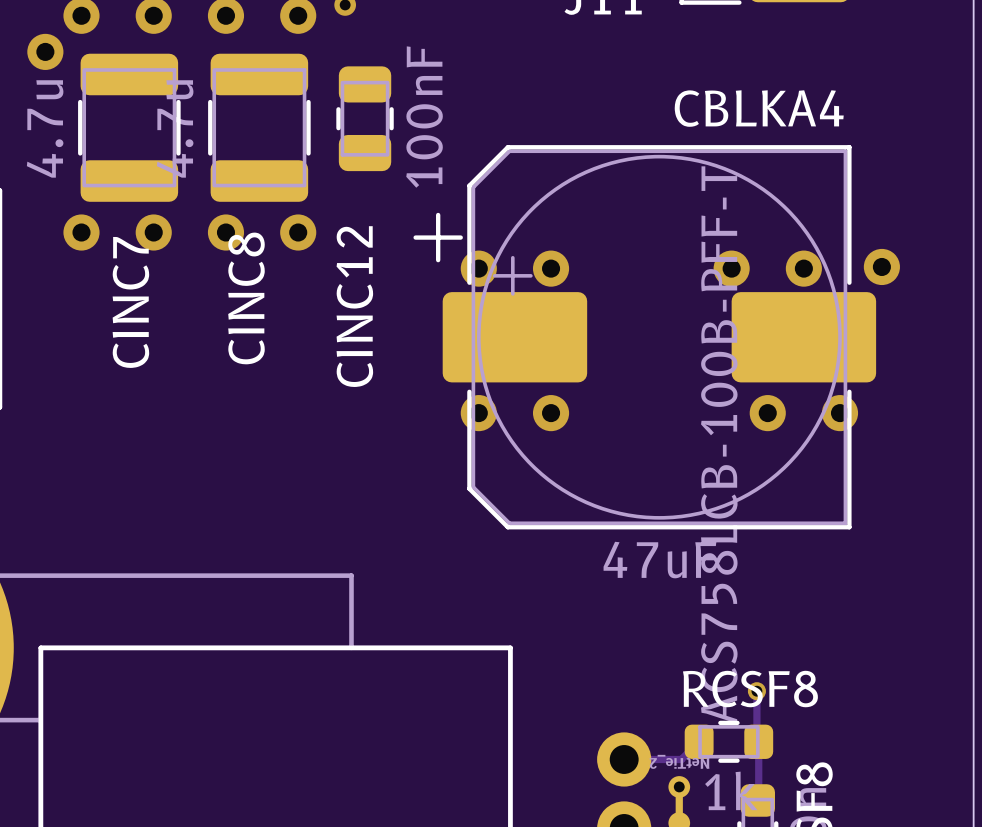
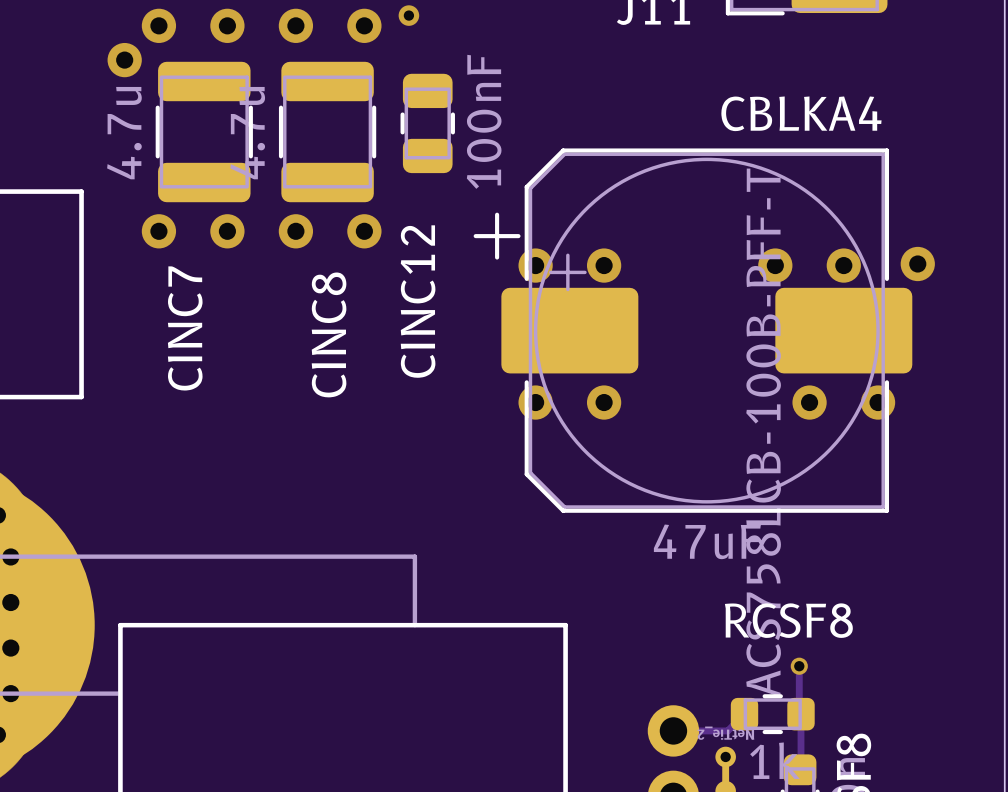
CINC8 name position: CINC8 (246, 298) -> CINC8 (329, 334)
CINC7 name position: CINC7 (130, 302) -> CINC7 (185, 328)
RCSF8 name position: RCSF8 (750, 689) -> RCSF8 (788, 620)

